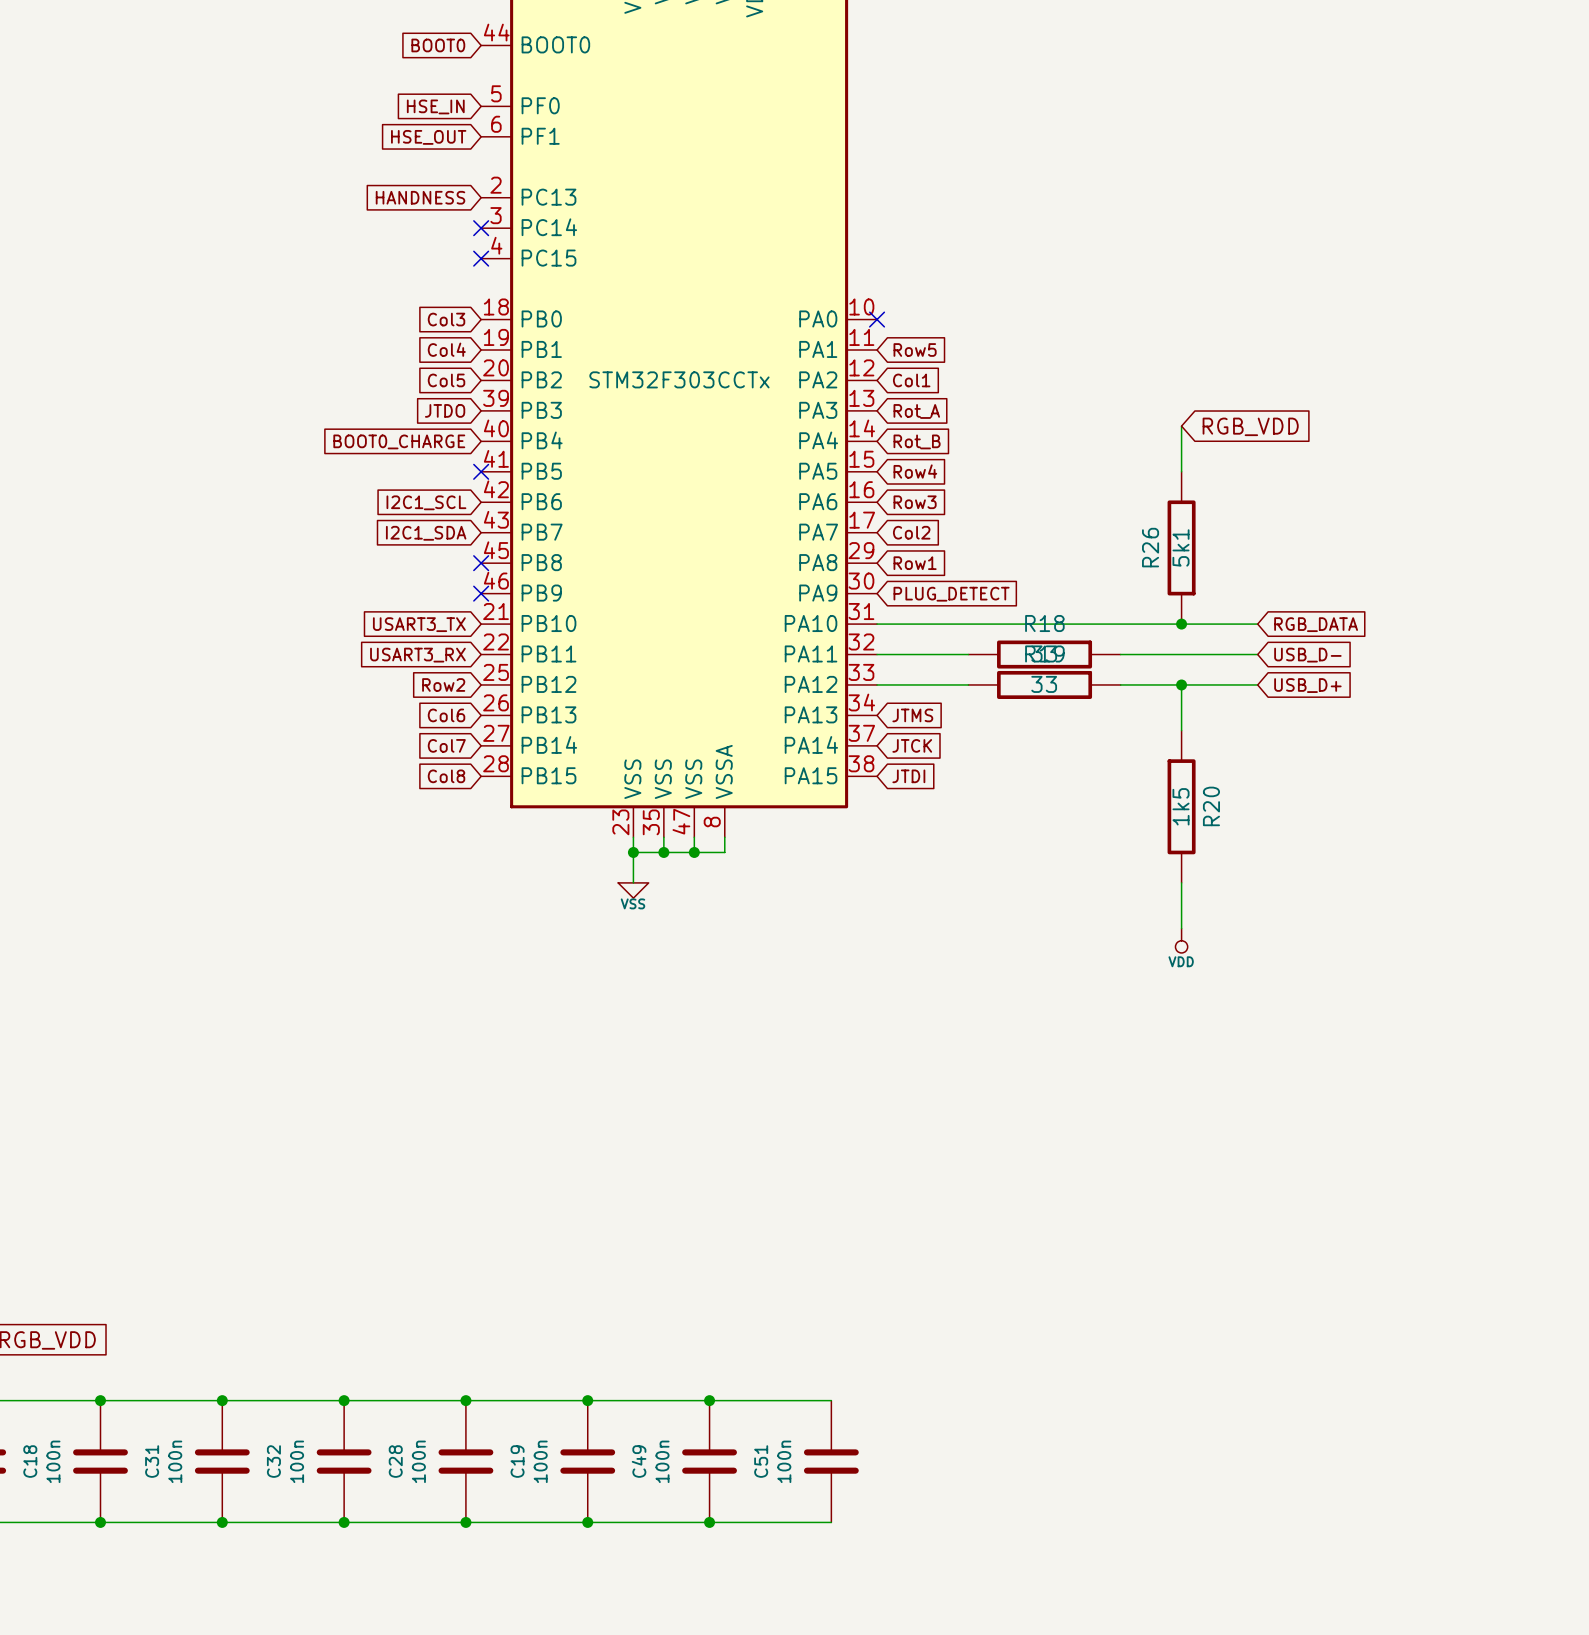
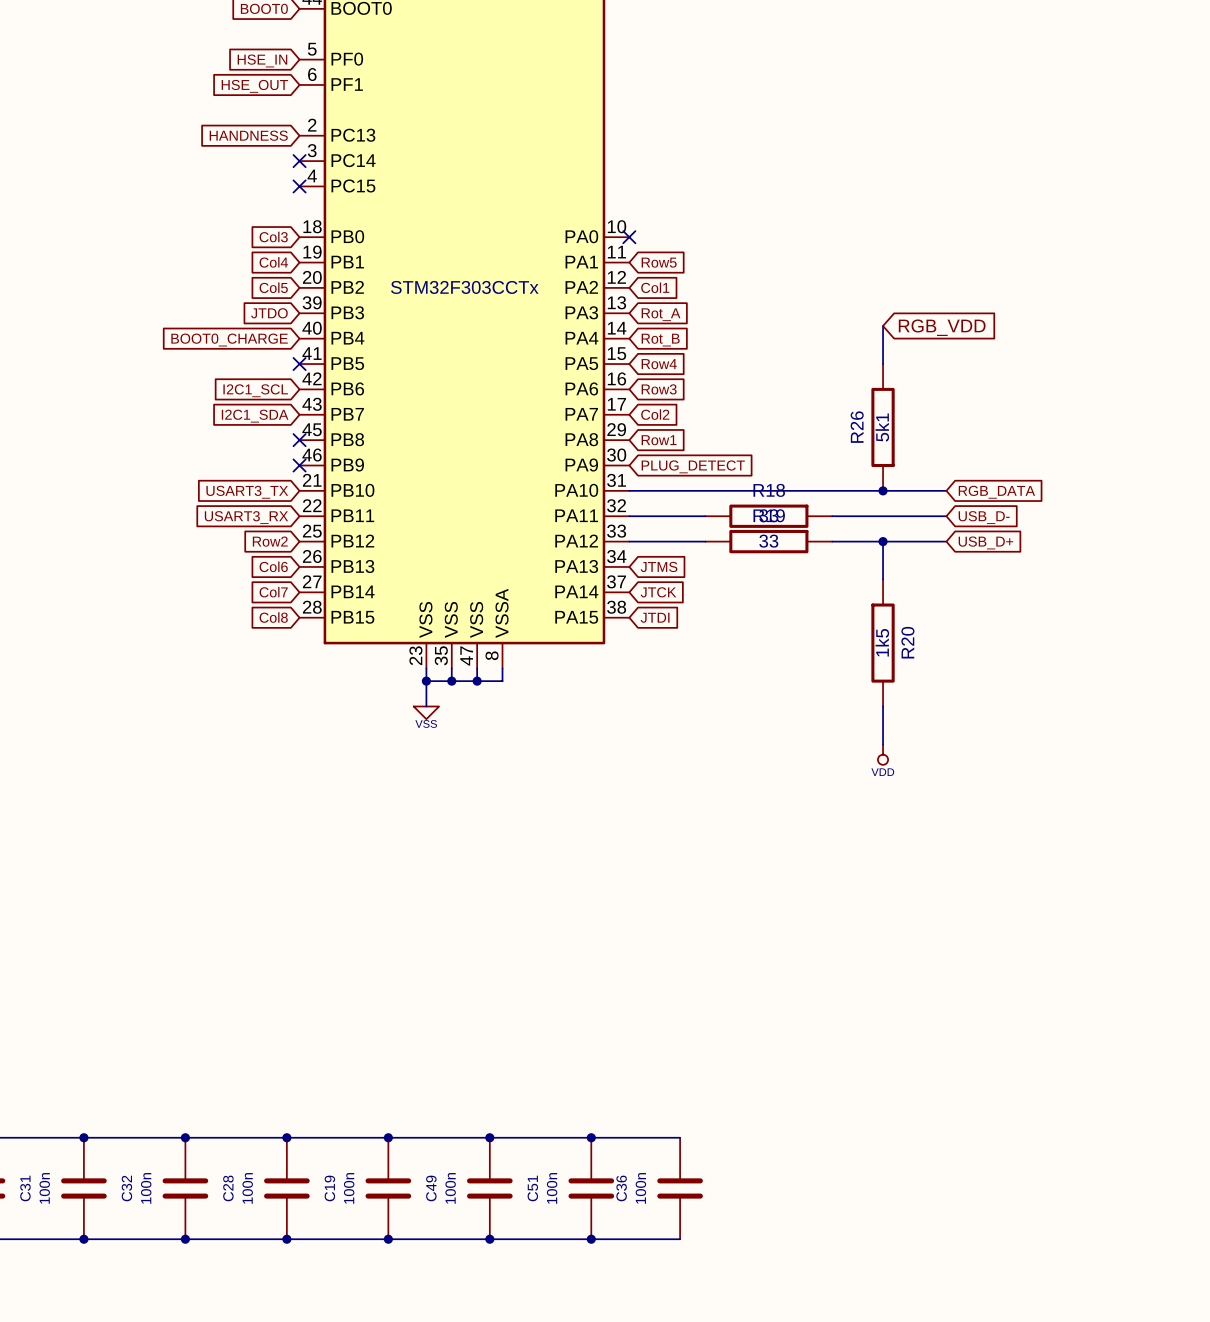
wire: none -> (591, 1137) (680, 1137)
junction: none -> (591, 1137)
C36: none -> 100n (680, 1188)
wire: none -> (591, 1239) (680, 1239)
junction: none -> (591, 1239)

